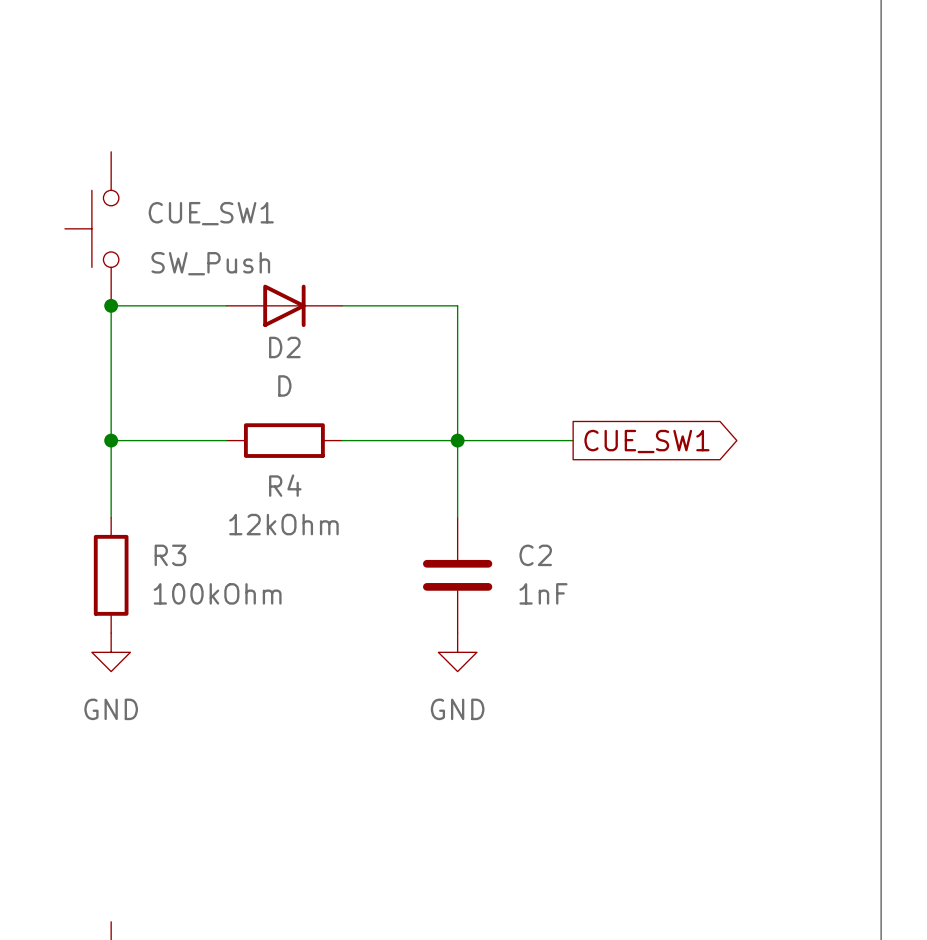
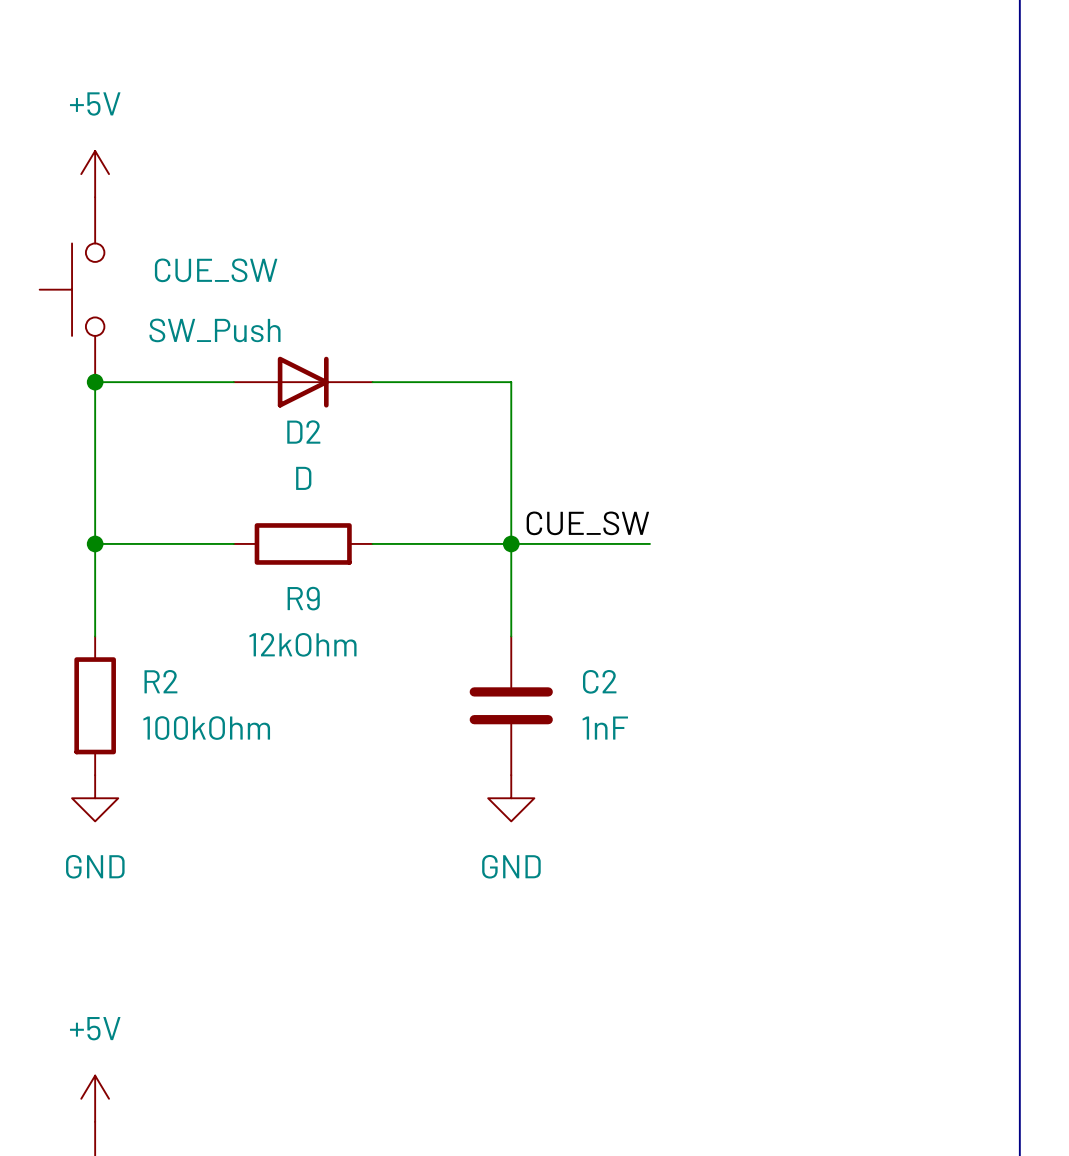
power symbol: none -> +5V (95, 174)
SW_Push value: CUE_SW1 (211, 213) -> CUE_SW (216, 270)
label: none -> CUE_SW (587, 523)
global label: CUE_SW1 (646, 441) -> none
R4 name: R4 (285, 485) -> R9 (303, 598)
R3 name: R3 (170, 555) -> R2 (160, 681)
power symbol: none -> +5V (95, 1098)

